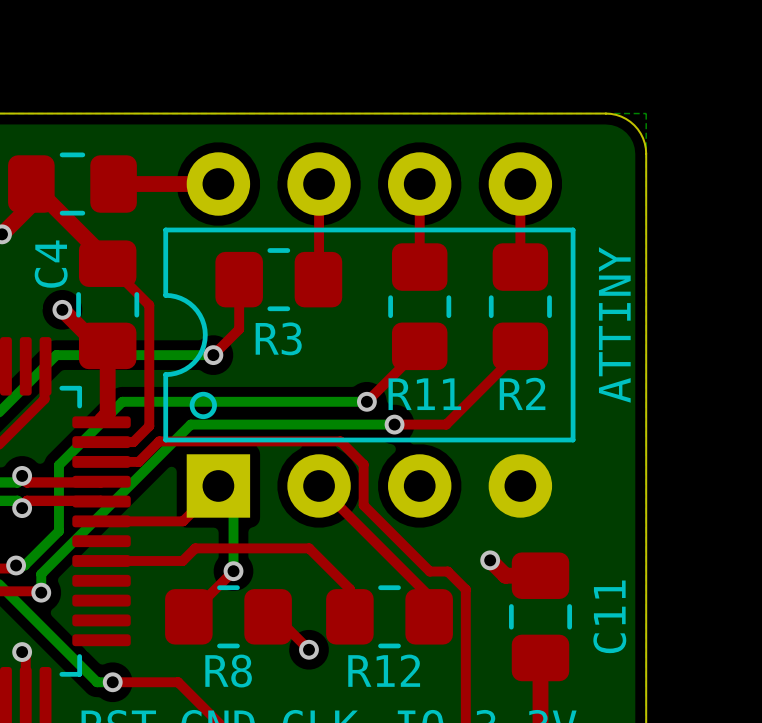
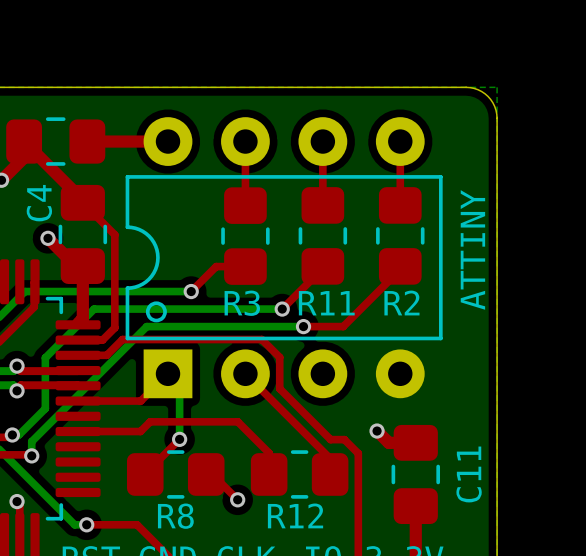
top track: (239, 279) (239, 329) (213, 355) -> none
R3 rotation: 0° (278, 279) -> 90° clockwise (245, 236)
top track: none -> (245, 266) (216, 266) (191, 291)
bottom track: (213, 355) (56, 355) (32, 379) -> (191, 291) (24, 291)
via position: (213, 355) -> (191, 291)

